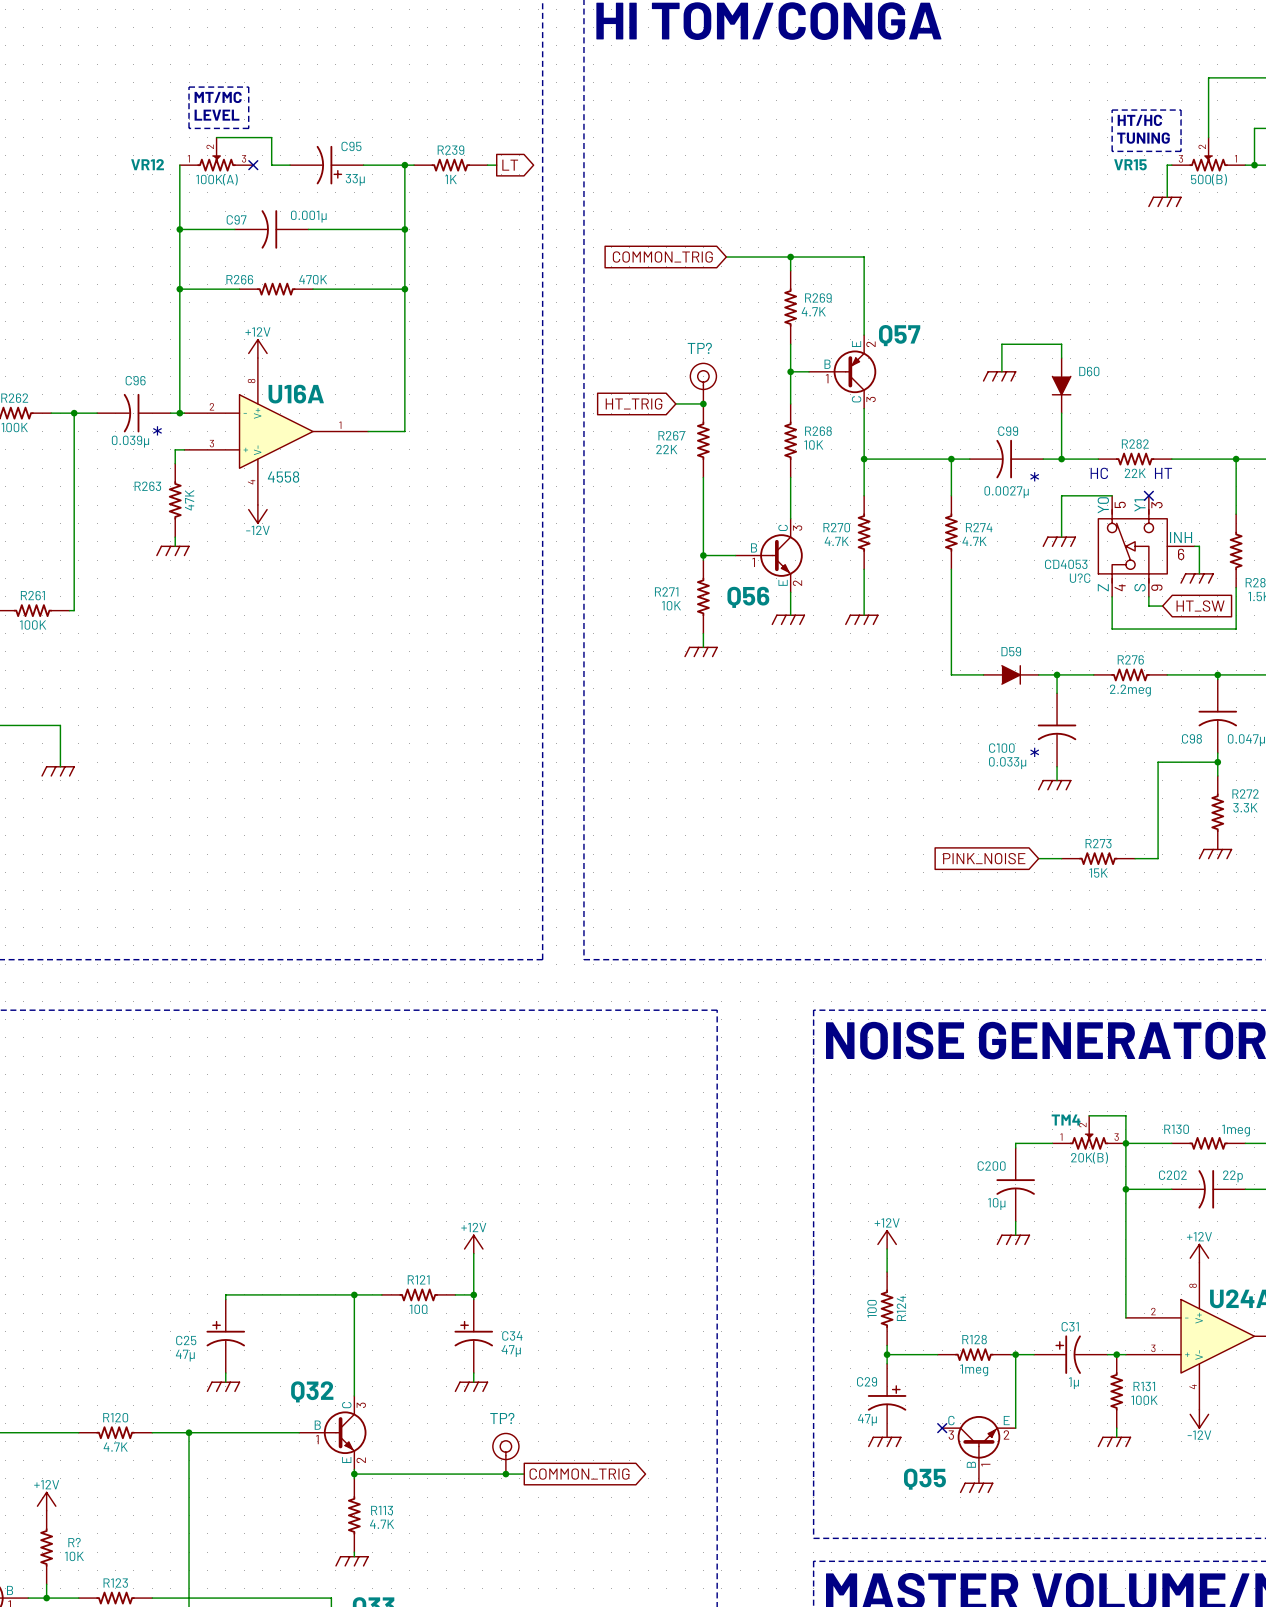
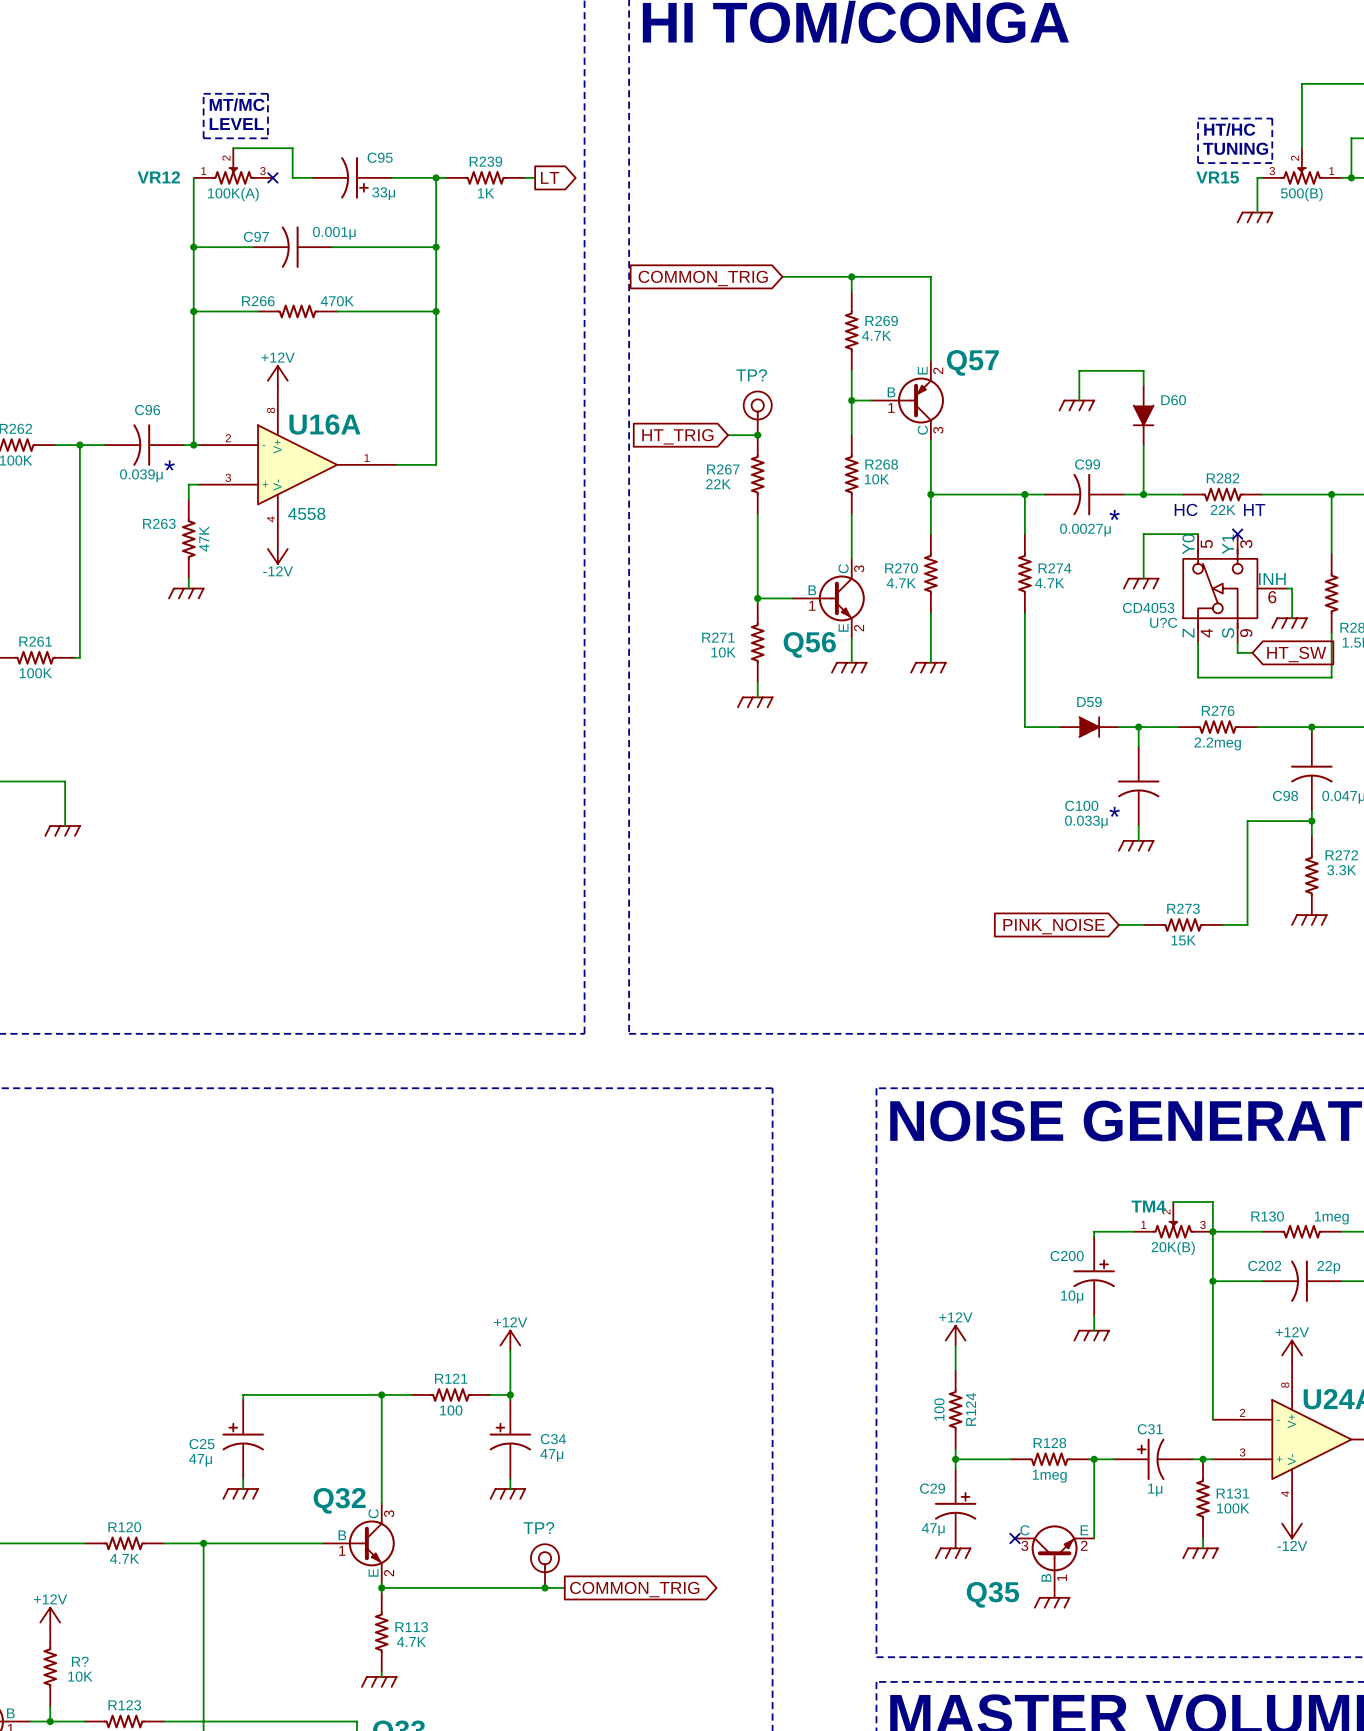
C200 symbol: [996, 1147, 1035, 1222] -> [1073, 1236, 1115, 1316]

